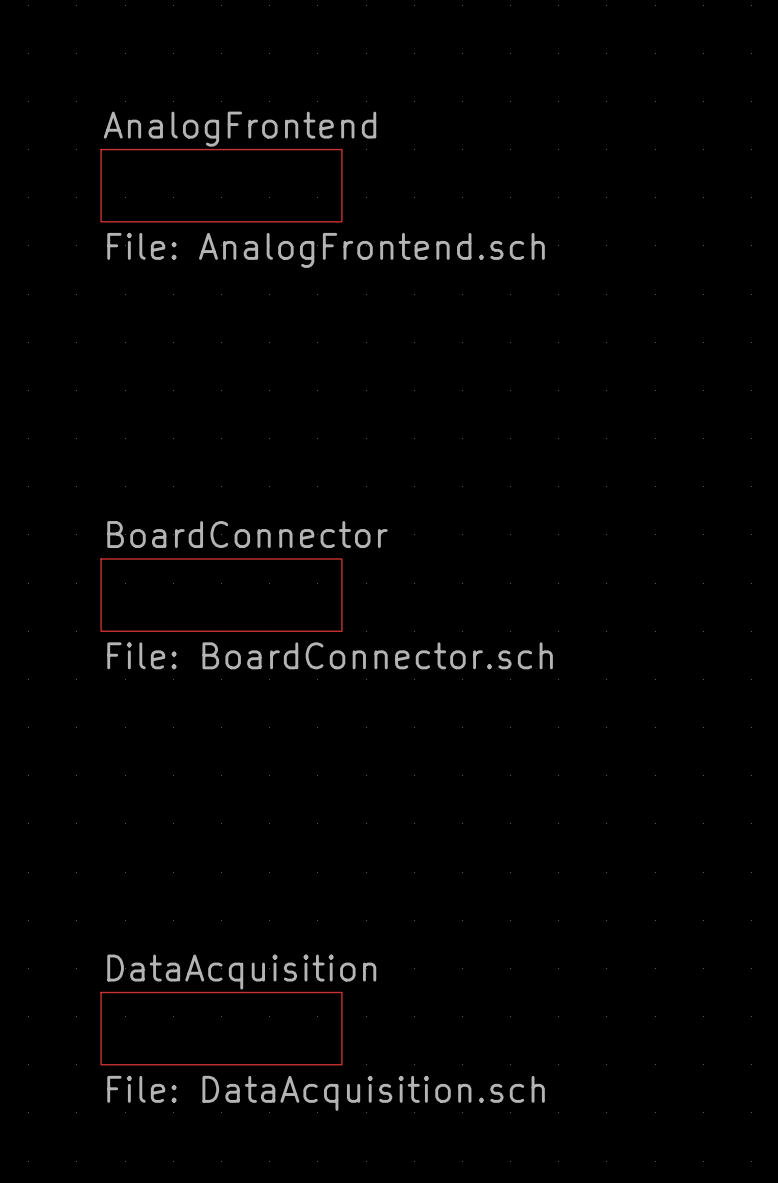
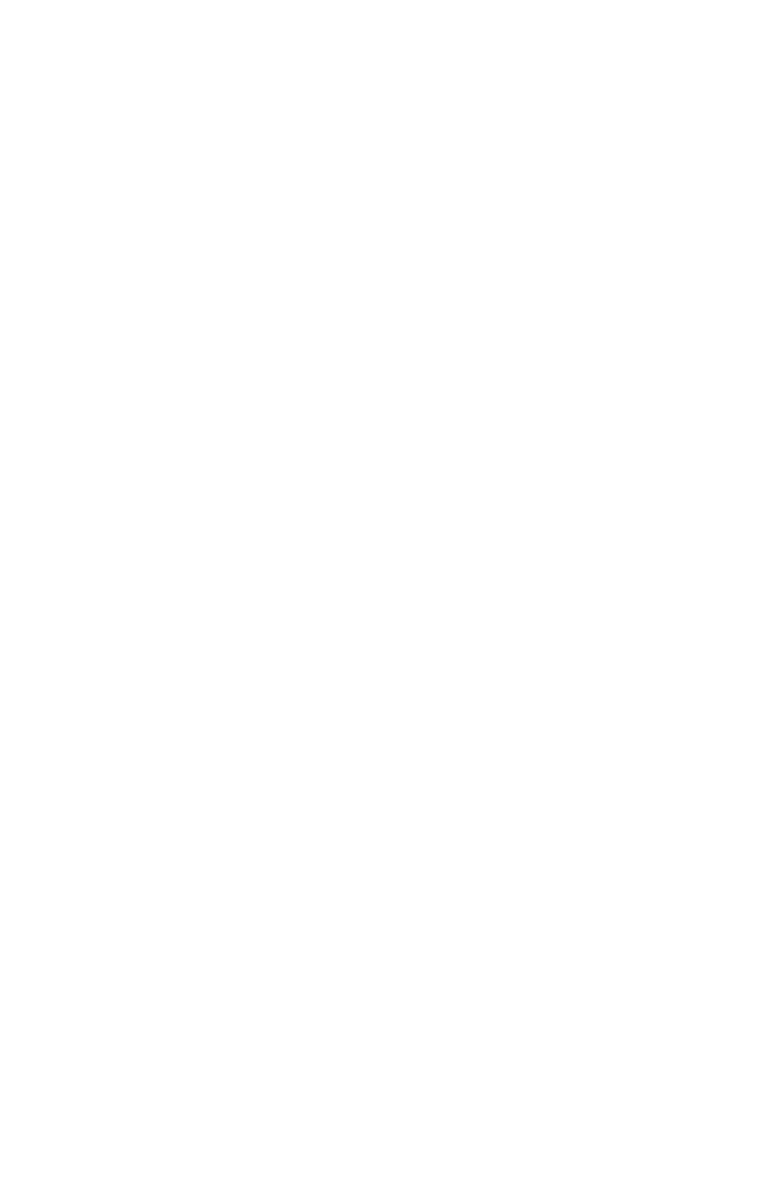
sheet AnalogFrontend: File: AnalogFrontend.sch (221, 185) -> none
sheet BoardConnector: File: BoardConnector.sch (221, 595) -> none
sheet DataAcquisition: File: DataAcquisition.sch (221, 1028) -> none

